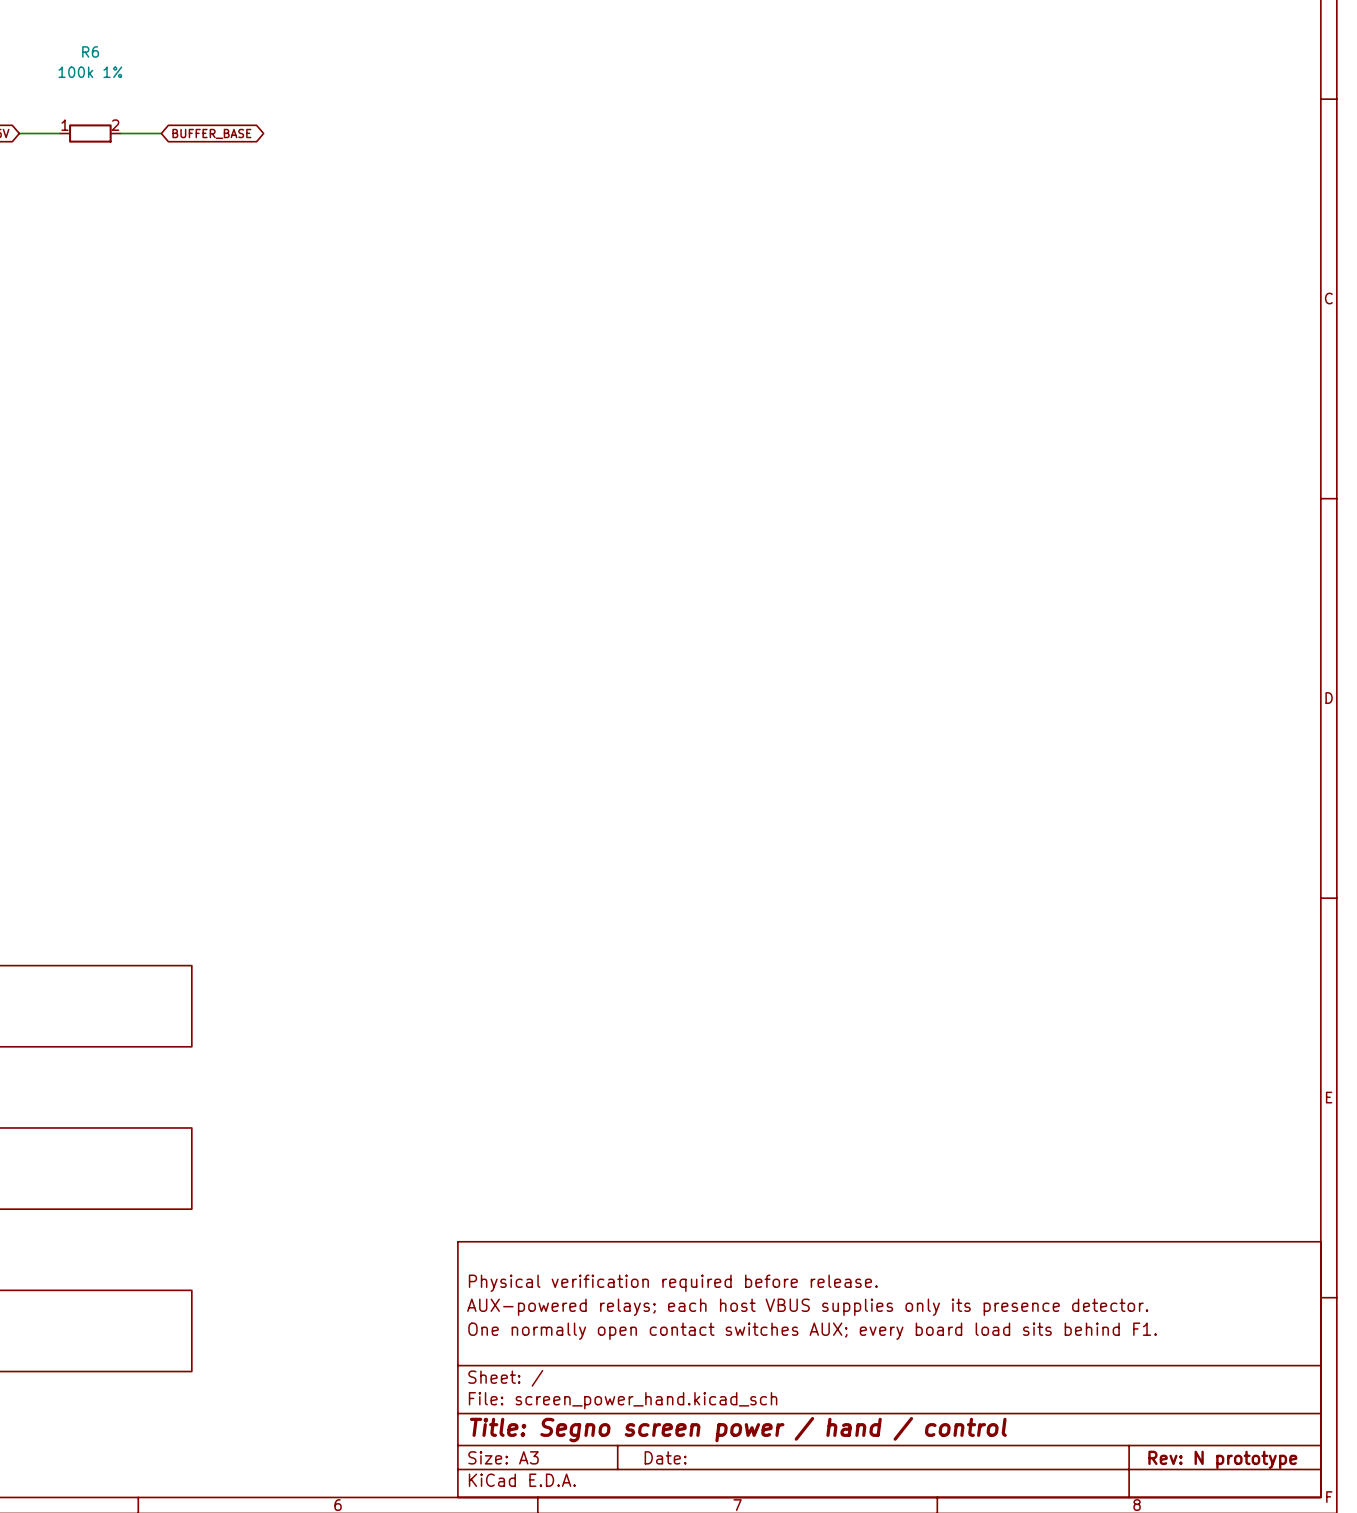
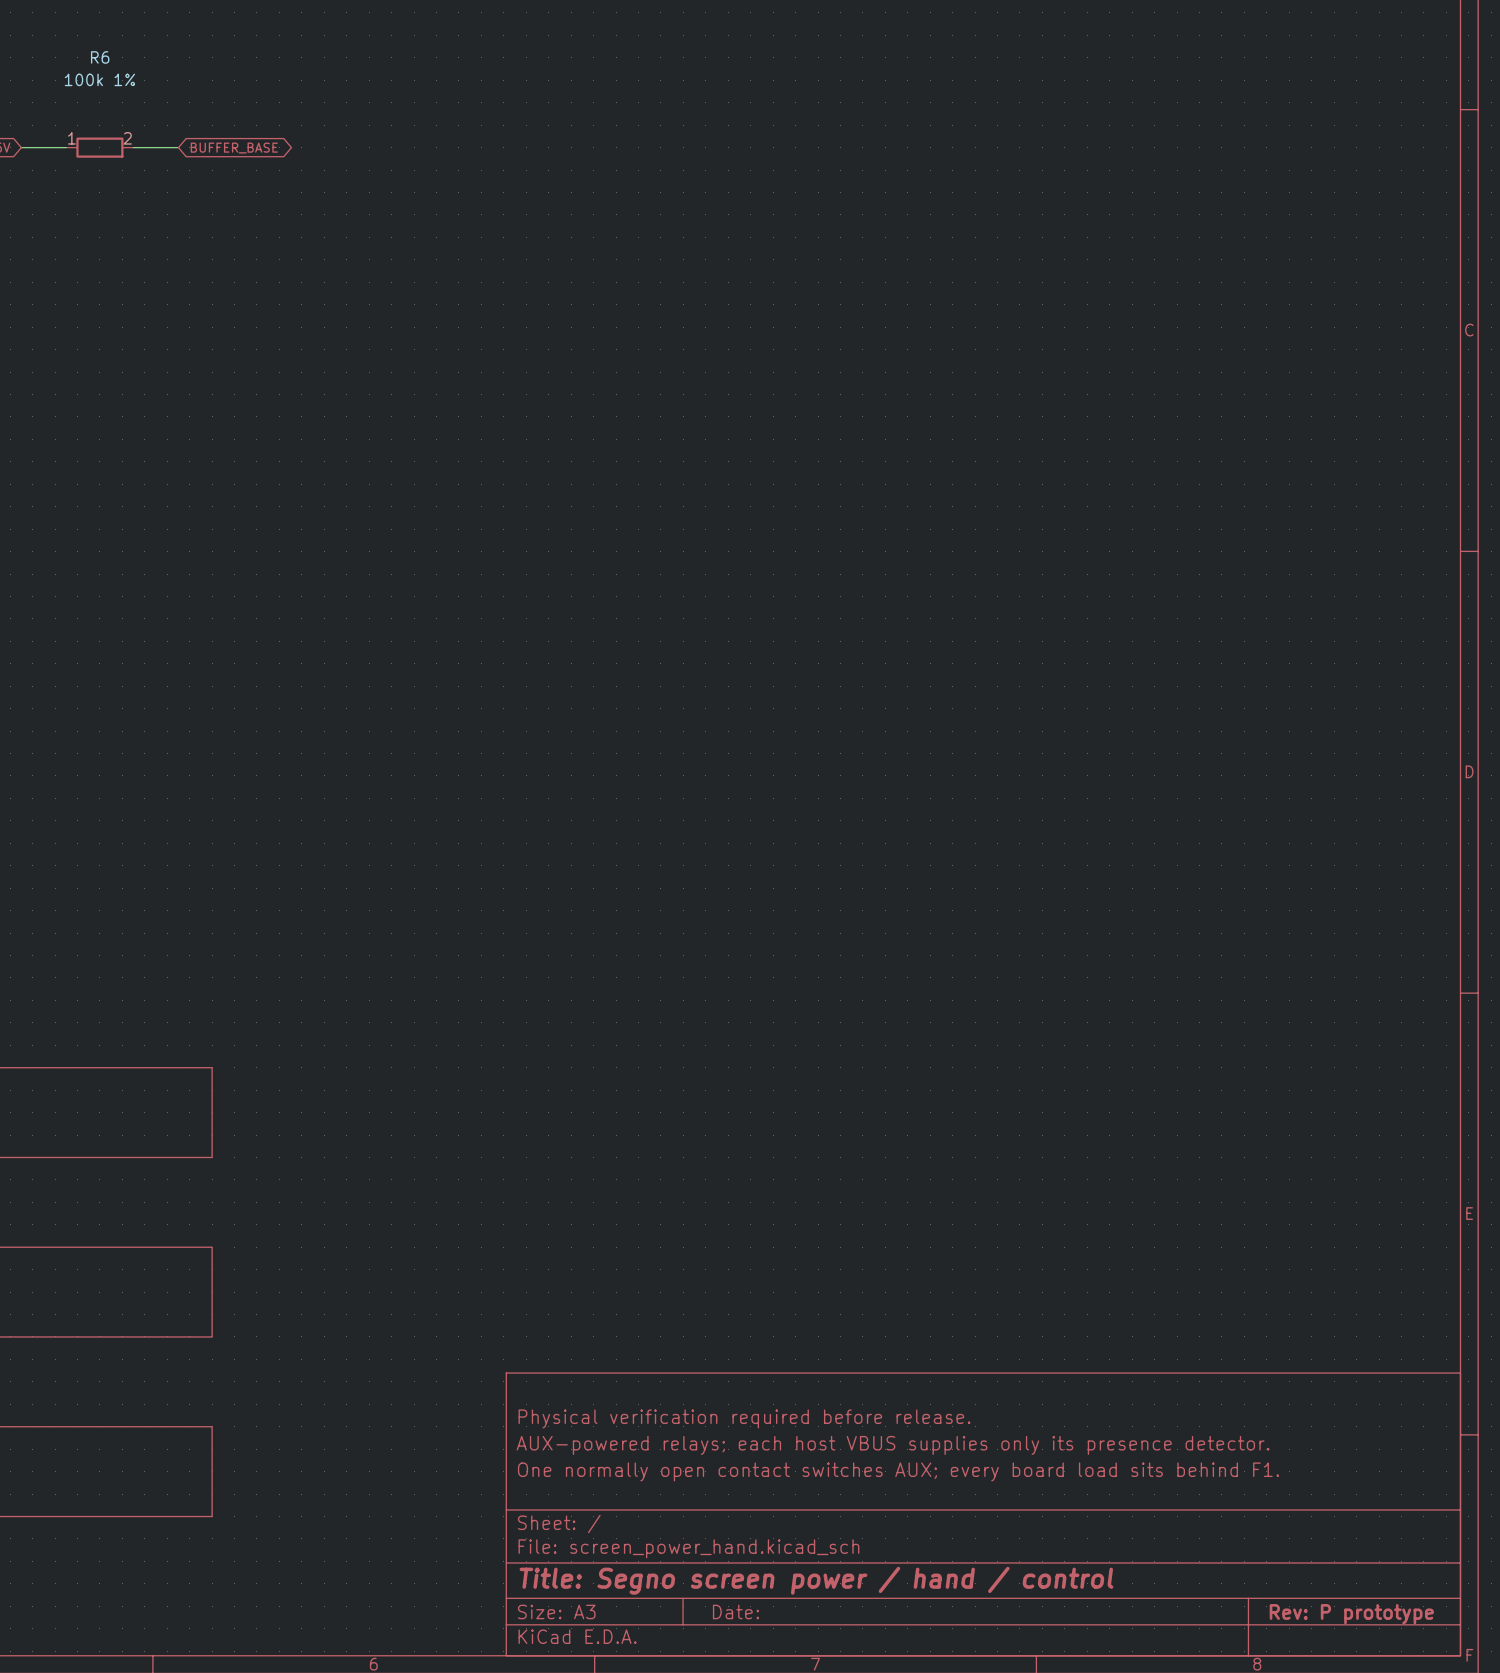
title block: Rev: N prototype (1222, 1459) -> Rev: P prototype (1351, 1614)

